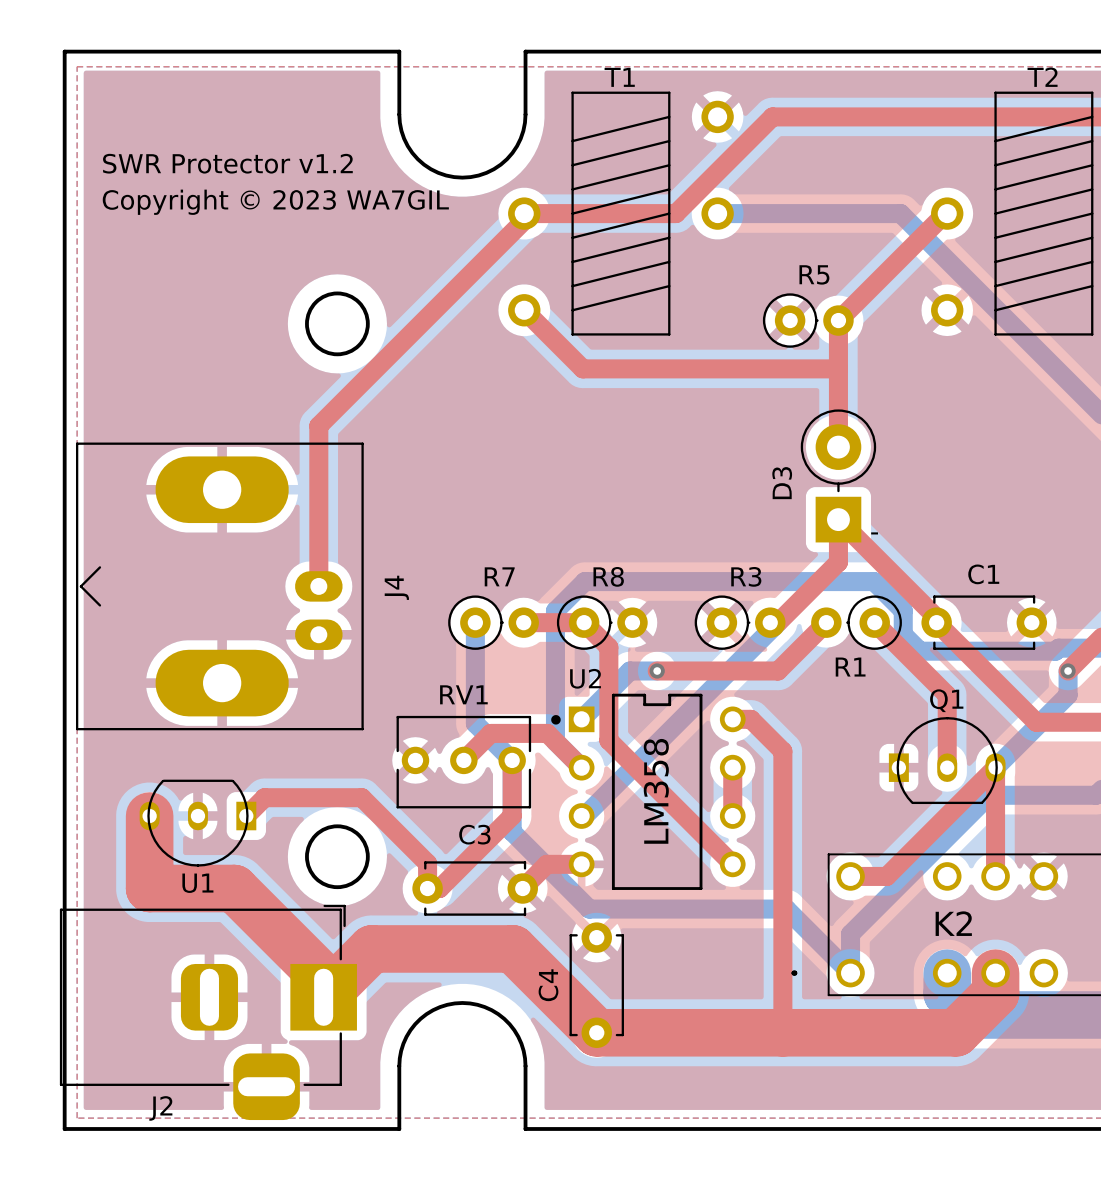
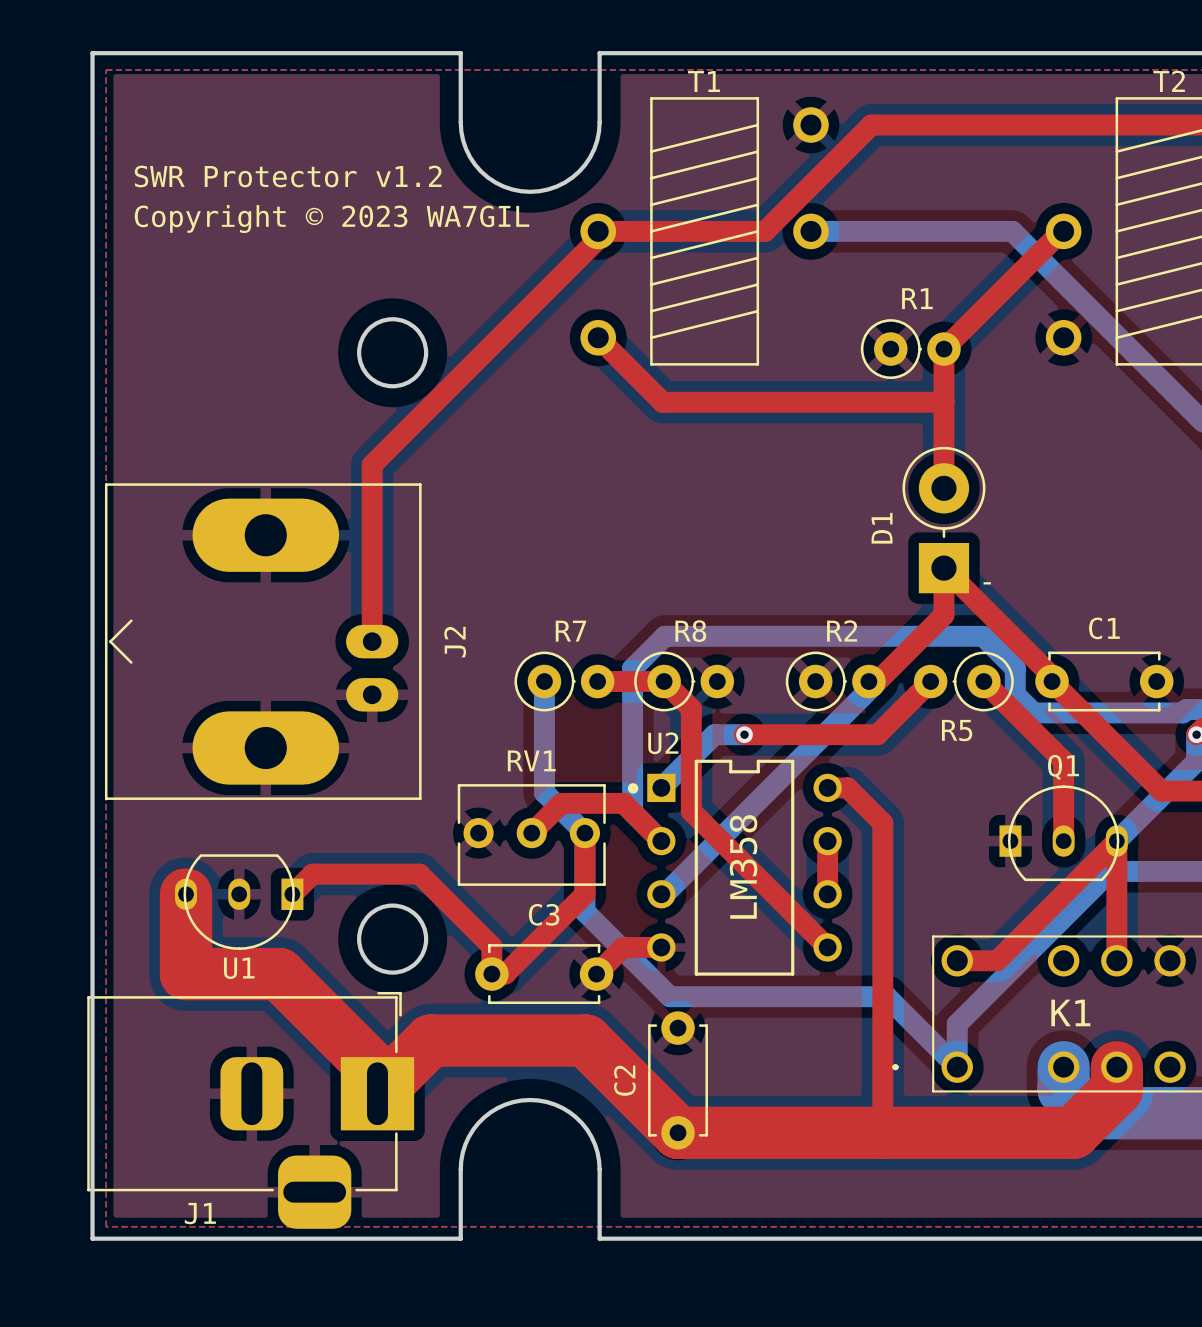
R5 name: R5 (814, 274) -> R1 (917, 298)
D3 name: D3 (782, 483) -> D1 (882, 528)
R3 name: R3 (746, 576) -> R2 (842, 630)
J4 name: J4 (396, 587) -> J2 (455, 642)
R1 name: R1 (850, 667) -> R5 (957, 730)
K2 name: K2 (953, 923) -> K1 (1070, 1012)
C4 name: C4 (548, 985) -> C2 (624, 1080)
J2 name: J2 (160, 1108) -> J1 (200, 1213)

